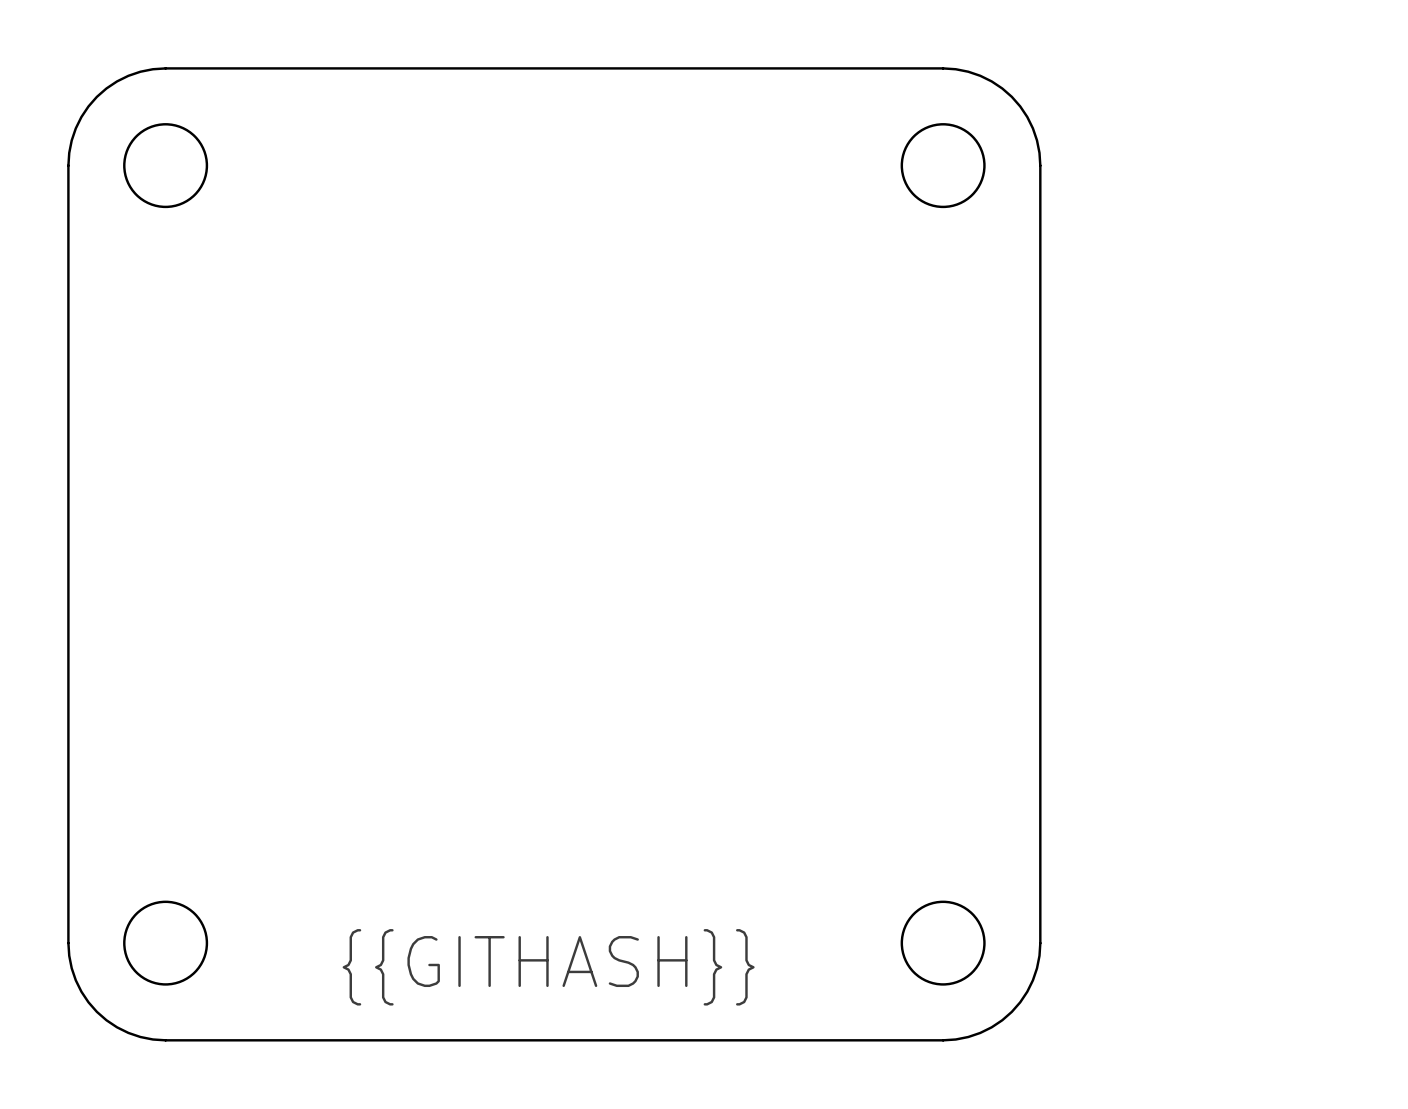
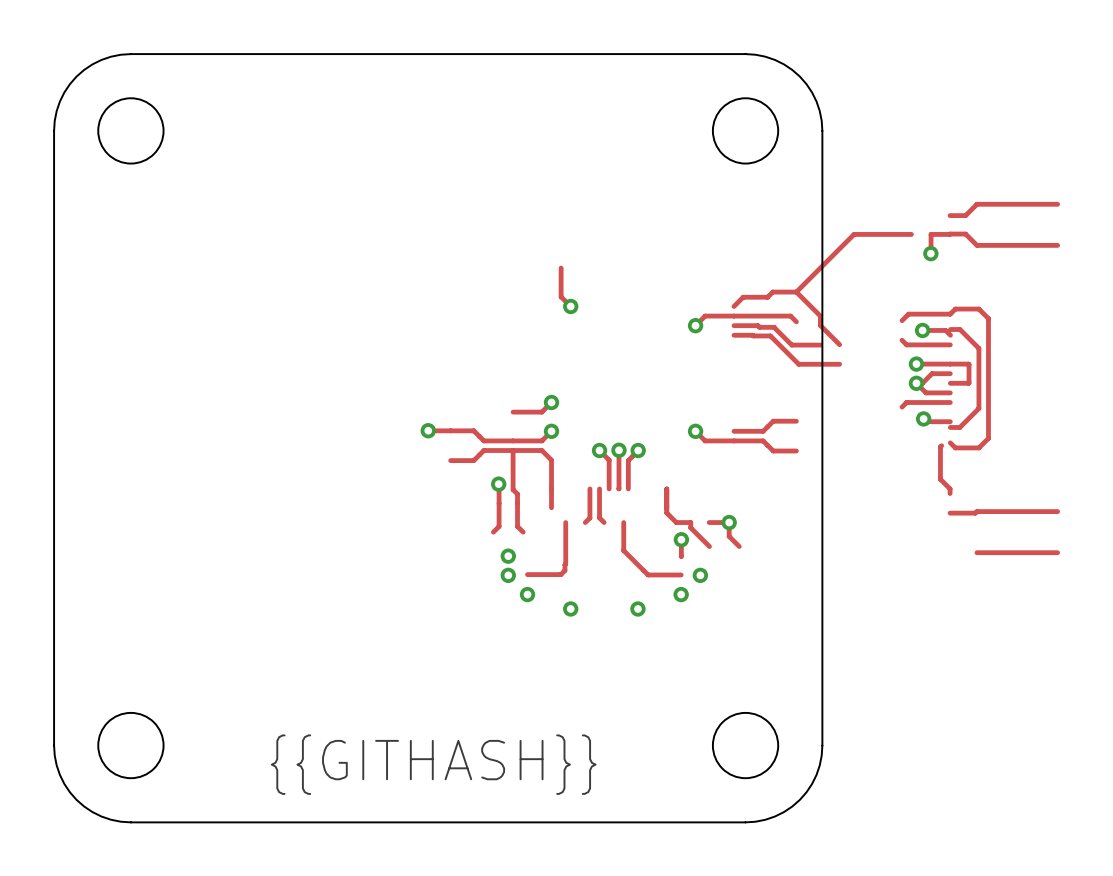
track: none -> (1057, 204) (976, 204) (965, 215) (950, 215)
track: none -> (911, 234) (854, 234) (796, 292)
track: none -> (1057, 245) (976, 245) (965, 234) (931, 234) (931, 253)
via: none -> (930, 253)
track: none -> (561, 268) (561, 296) (570, 306)
track: none -> (796, 292) (772, 292) (767, 297) (743, 297) (733, 306)
track: none -> (796, 292) (820, 316) (820, 325) (839, 344)
via: none -> (570, 306)
track: none -> (902, 320) (908, 314) (950, 314) (955, 309) (978, 309) (988, 318) (988, 438) (978, 447) (955, 447) (950, 442)
track: none -> (796, 321) (790, 316) (705, 316) (695, 325)
via: none -> (695, 325)
track: none -> (733, 325) (774, 327) (791, 345) (820, 345)
track: none -> (950, 329) (960, 329) (978, 348) (978, 408) (959, 427) (950, 427)
track: none -> (922, 330) (945, 330) (950, 335)
via: none -> (922, 330)
track: none -> (733, 335) (770, 335) (798, 364) (839, 364)
track: none -> (902, 340) (906, 344) (950, 344)
track: none -> (916, 364) (968, 364) (969, 382) (950, 383)
via: none -> (916, 364)
track: none -> (950, 373) (932, 373) (922, 383) (916, 383) (926, 392) (950, 392)
via: none -> (916, 383)
track: none -> (551, 402) (541, 412) (513, 412)
via: none -> (551, 402)
track: none -> (950, 402) (906, 402) (902, 407)
track: none -> (923, 418) (926, 421) (950, 421)
via: none -> (923, 418)
track: none -> (796, 421) (773, 421) (763, 431) (733, 431)
via: none -> (428, 430)
track: none -> (428, 430) (473, 430) (483, 440) (541, 440) (551, 431)
via: none -> (551, 431)
track: none -> (695, 431) (705, 440) (763, 440) (773, 451) (796, 451)
via: none -> (695, 431)
track: none -> (941, 445) (940, 479) (950, 488) (950, 493)
track: none -> (513, 450) (513, 489) (517, 494) (517, 526) (523, 532)
track: none -> (599, 450) (609, 460) (609, 488)
via: none -> (599, 450)
track: none -> (618, 450) (618, 488)
via: none -> (618, 450)
track: none -> (638, 450) (628, 460) (628, 488)
via: none -> (638, 450)
track: none -> (450, 460) (473, 460) (483, 450) (541, 450) (551, 460) (551, 507)
track: none -> (498, 484) (499, 526) (493, 532)
via: none -> (498, 484)
track: none -> (589, 488) (589, 517) (585, 522)
track: none -> (599, 488) (599, 517) (604, 522)
track: none -> (666, 488) (666, 512) (676, 522) (690, 522) (690, 527) (709, 546)
track: none -> (1057, 511) (950, 513)
track: none -> (565, 522) (564, 570) (560, 574) (527, 574)
track: none -> (623, 522) (623, 550) (648, 574) (681, 574)
track: none -> (709, 522) (729, 522) (729, 536) (739, 546)
via: none -> (729, 522)
track: none -> (681, 539) (681, 556)
via: none -> (681, 539)
track: none -> (976, 552) (1057, 552)
via: none -> (508, 556)
via: none -> (508, 575)
via: none -> (700, 575)
via: none -> (527, 594)
via: none -> (681, 594)
via: none -> (570, 608)
via: none -> (637, 608)

